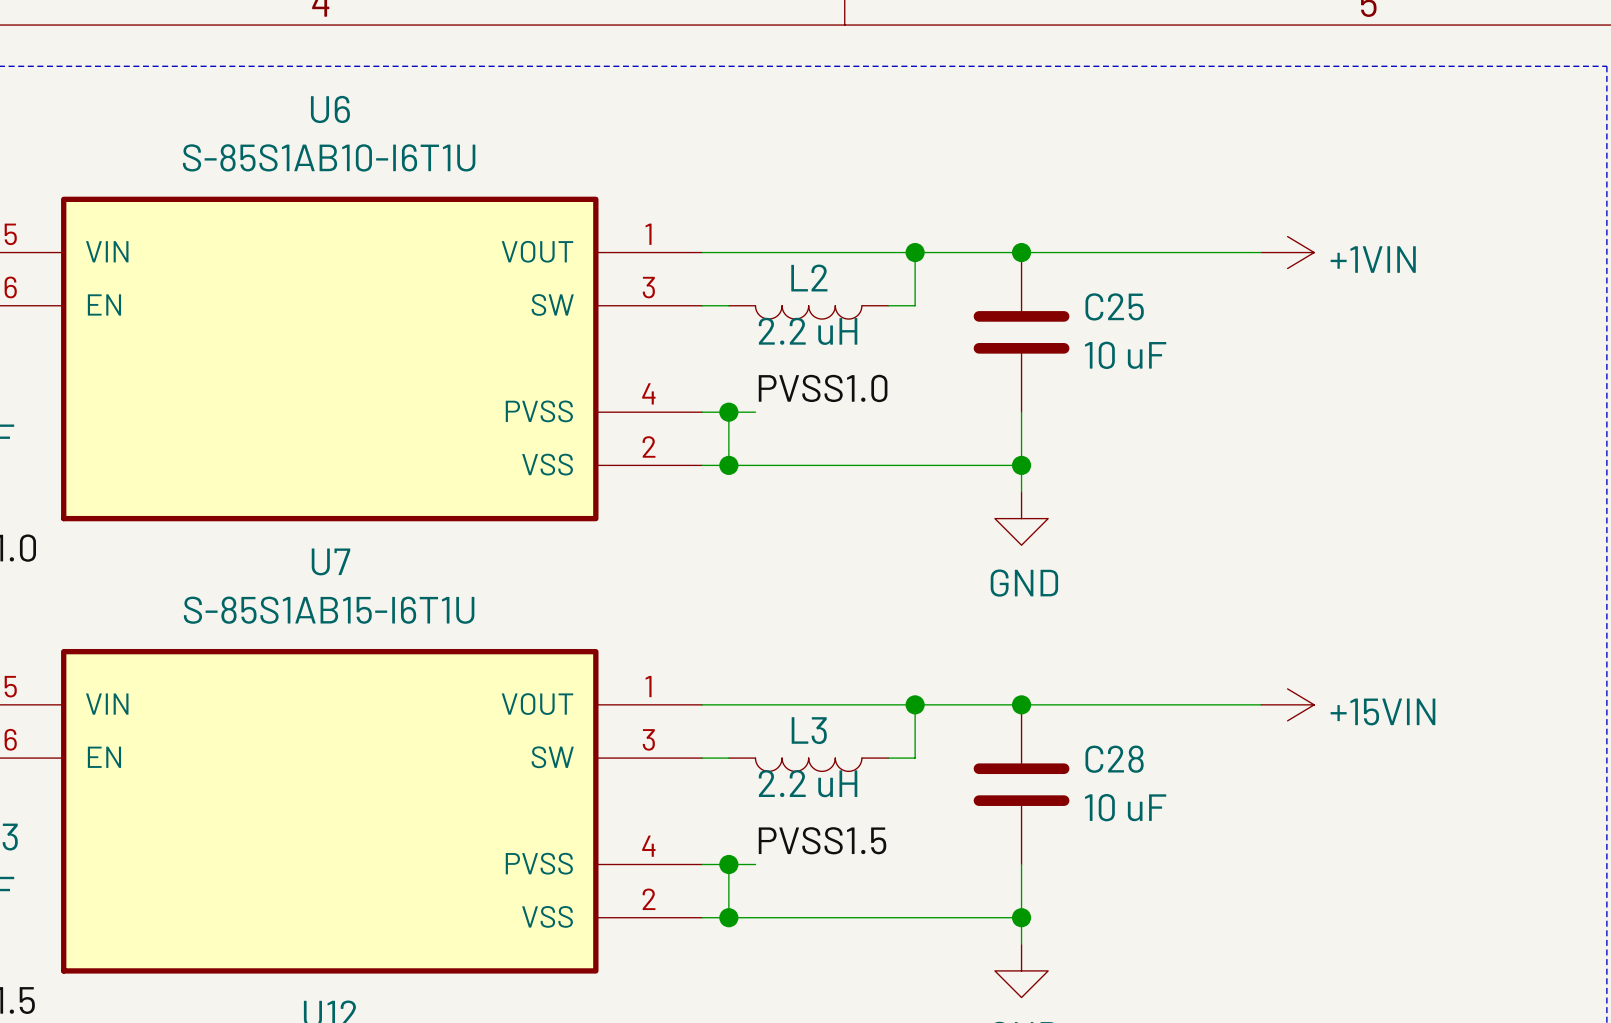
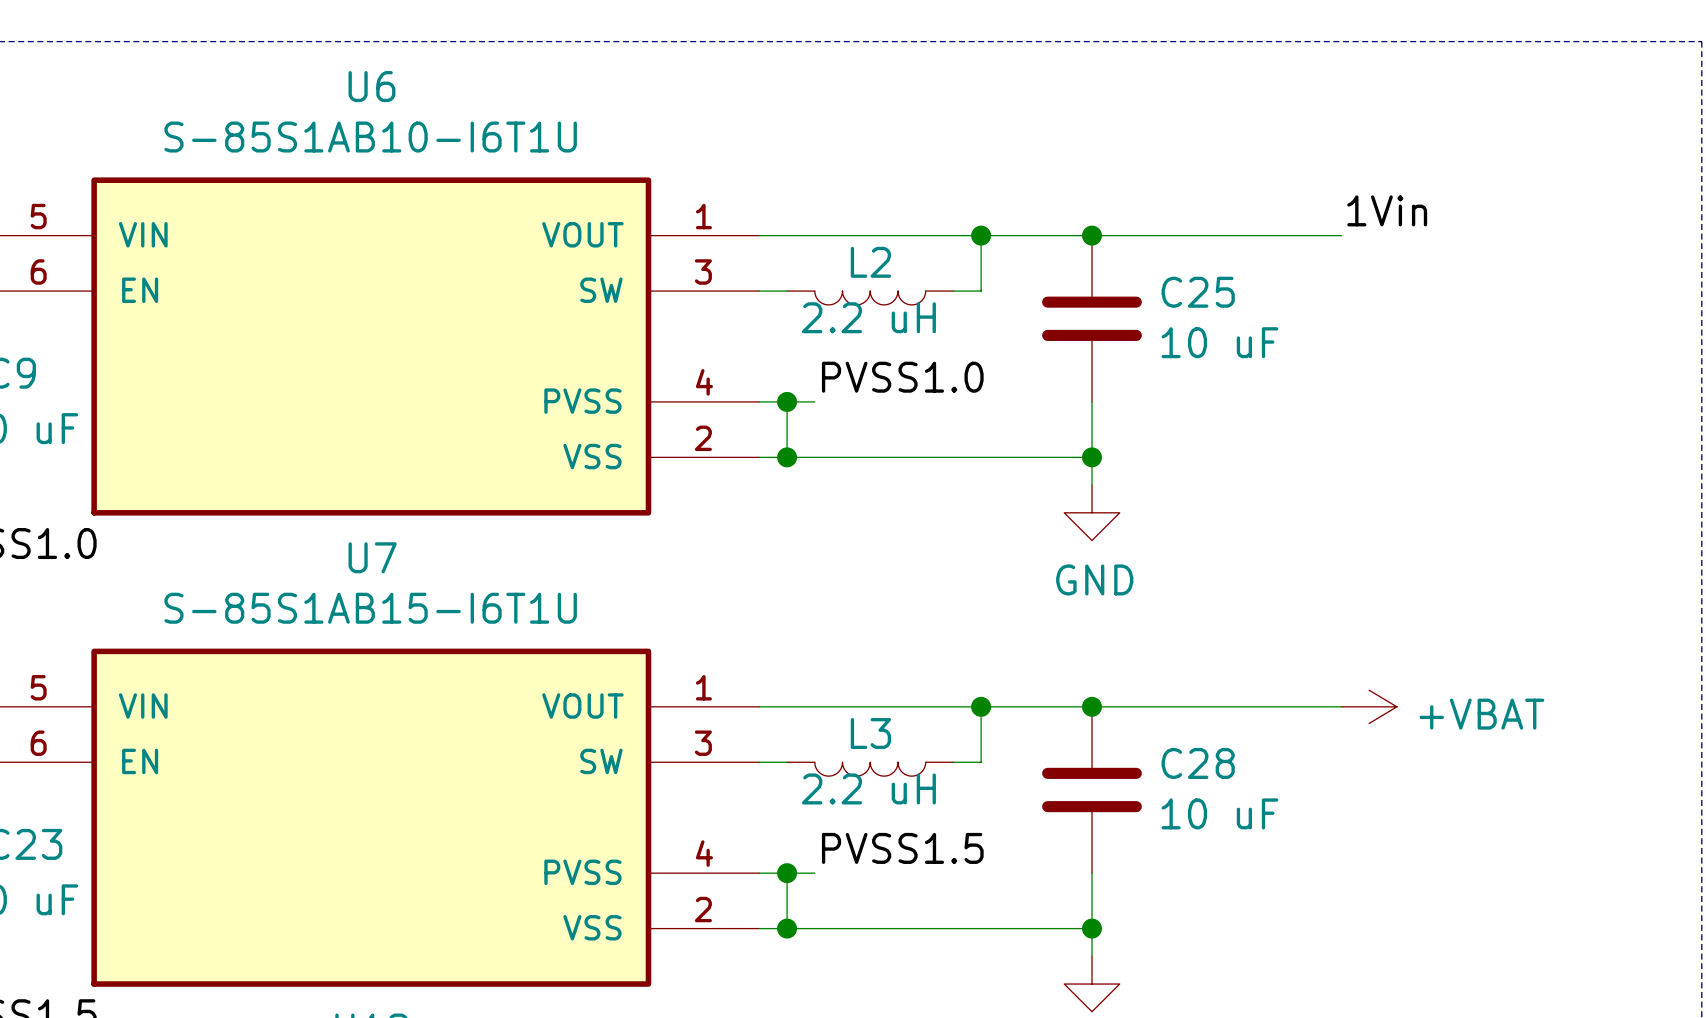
label: none -> 1Vin (1387, 210)
power symbol: +1VIN (1287, 252) -> none
power symbol: +15VIN (1287, 704) -> +VBAT (1369, 706)

